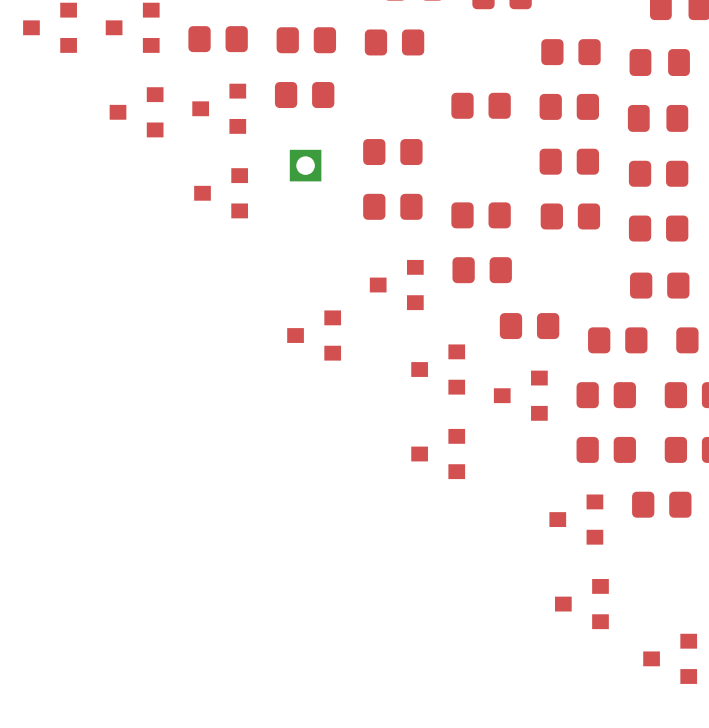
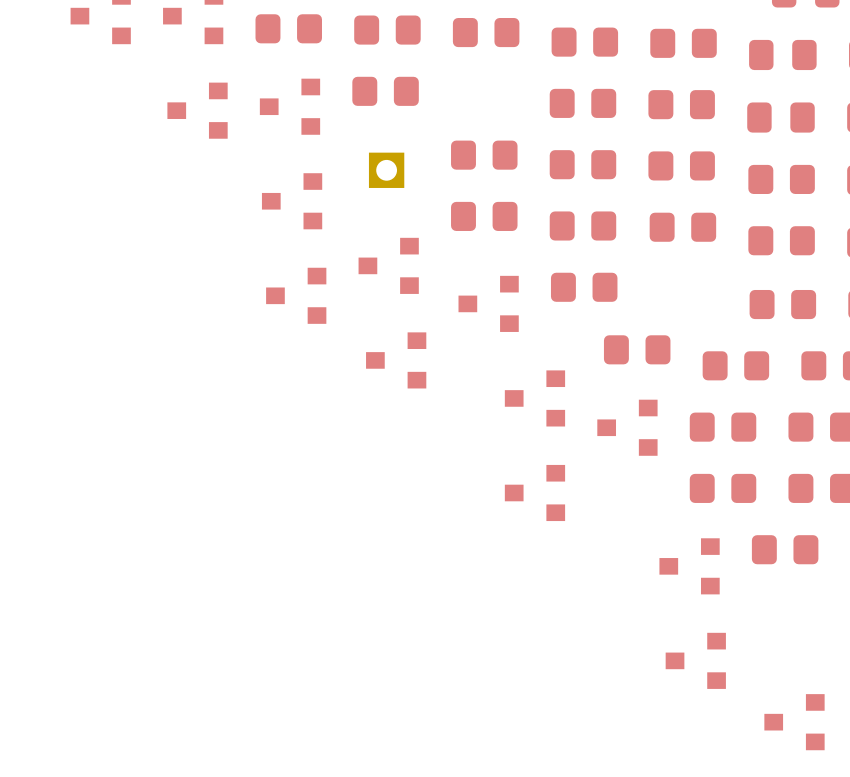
part: none -> (584, 42)
part: none -> (582, 164)
part: none -> (388, 265)
part: none -> (296, 295)

